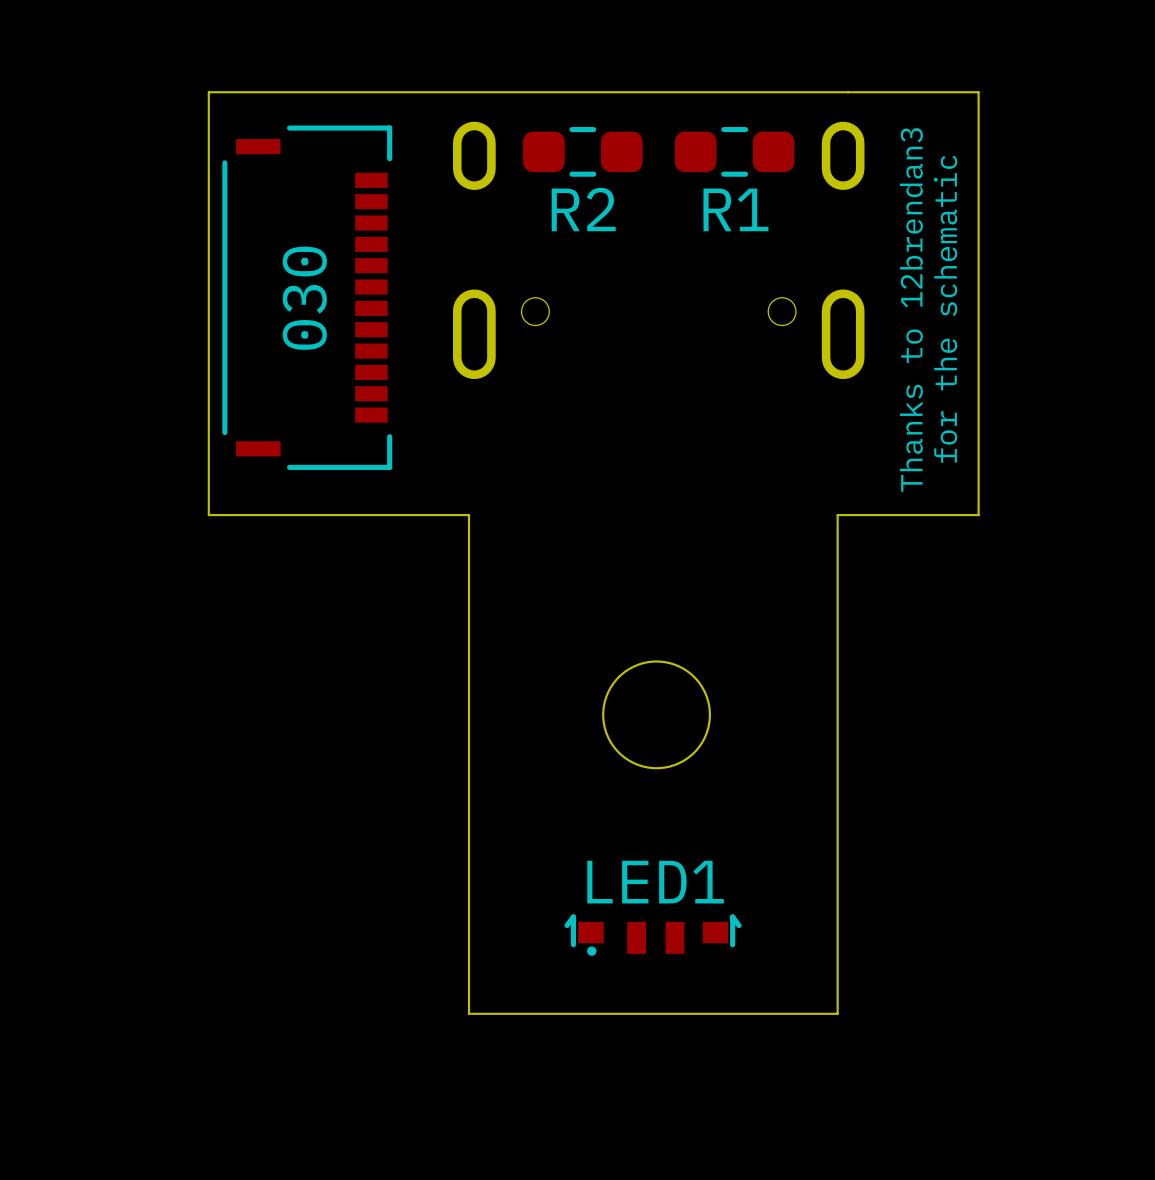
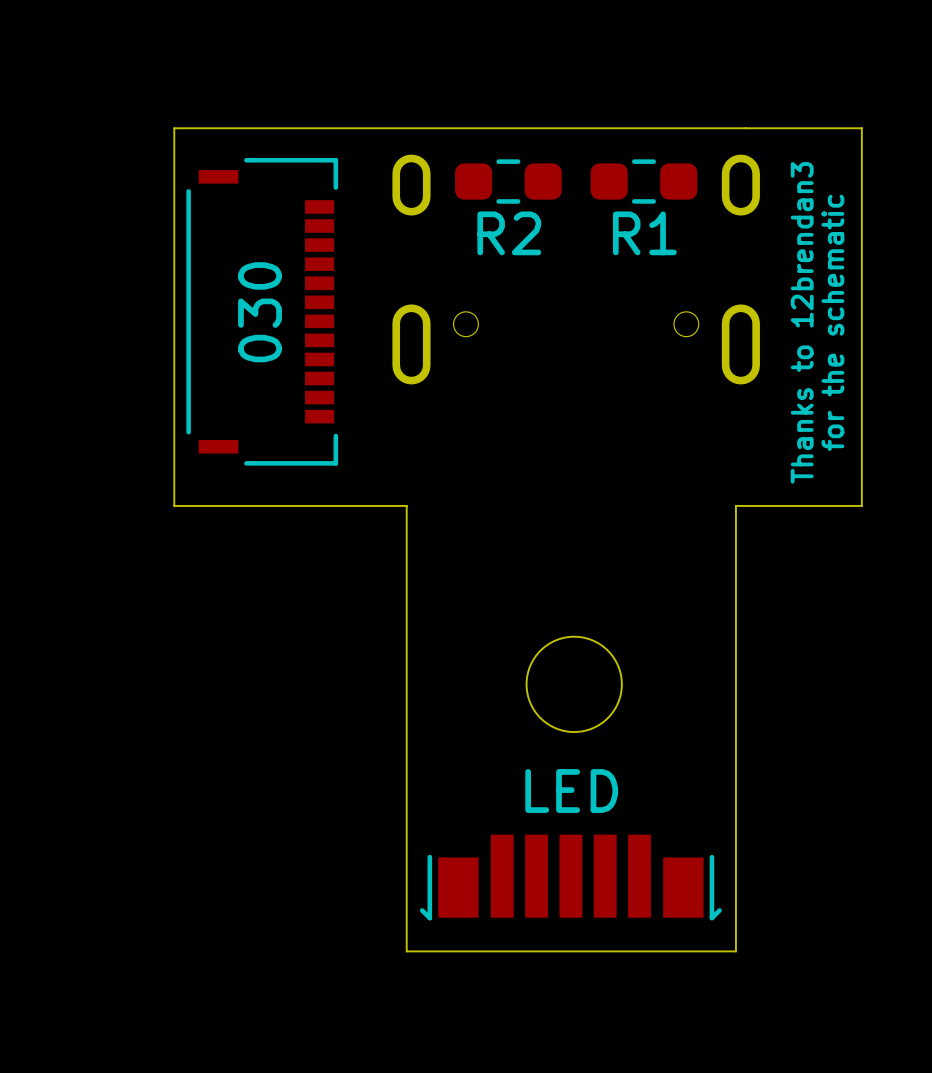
part: none -> (570, 877)
LED1: (653, 935) -> none

